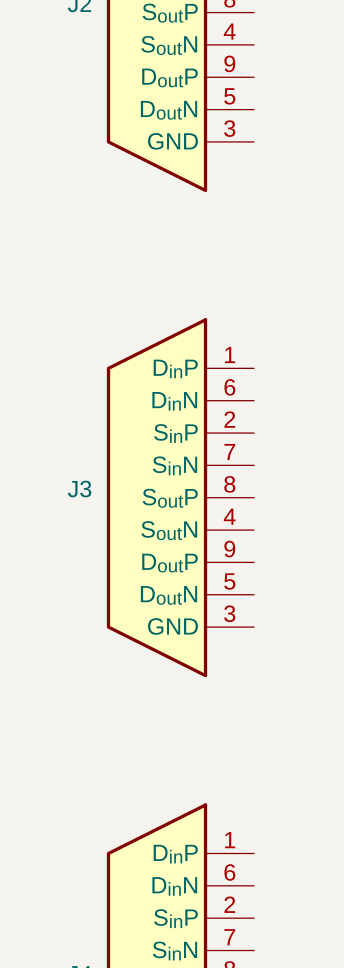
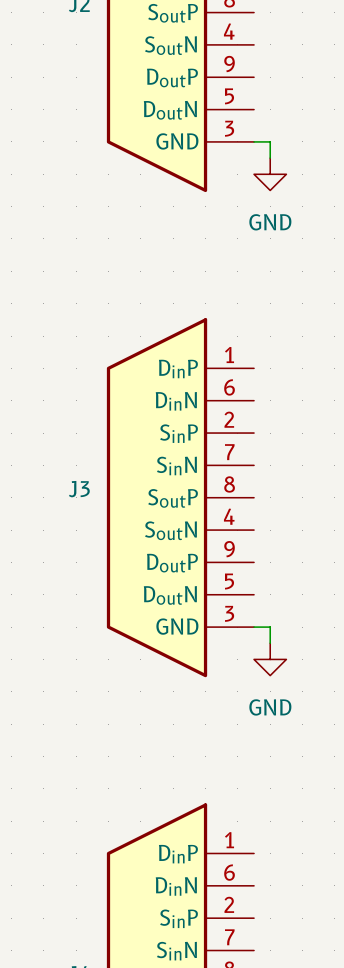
wire: none -> (254, 141) (270, 141) (270, 158)
power symbol: none -> GND (270, 174)
wire: none -> (254, 627) (270, 627) (270, 643)
power symbol: none -> GND (270, 659)

